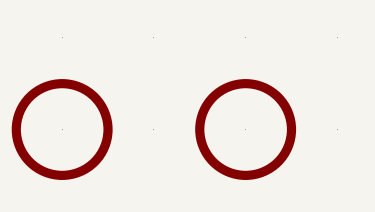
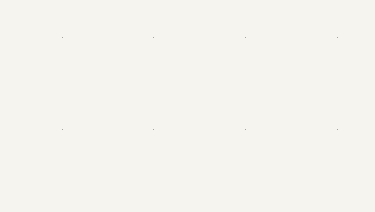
part: (62, 129) -> none
part: (245, 129) -> none

